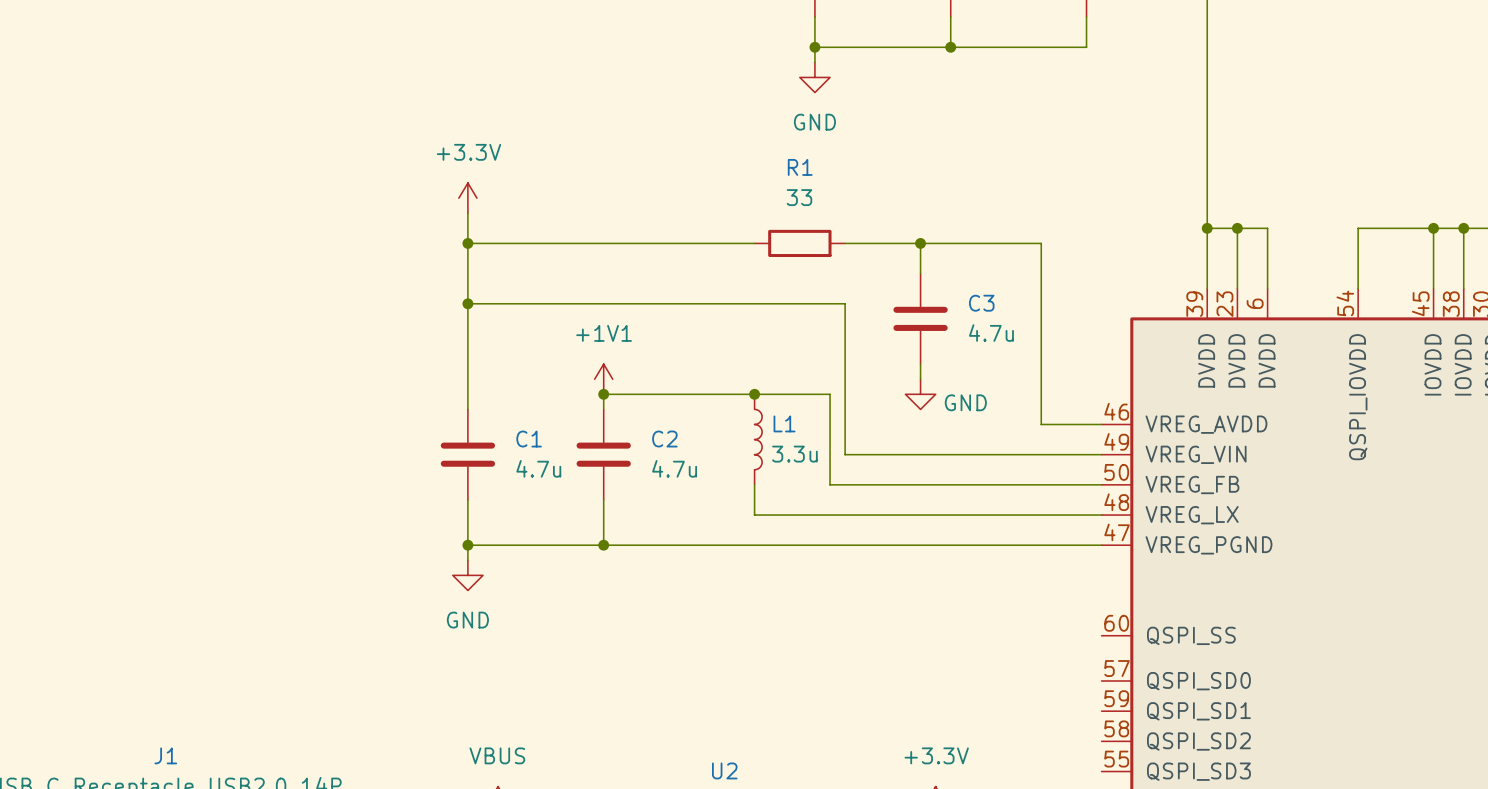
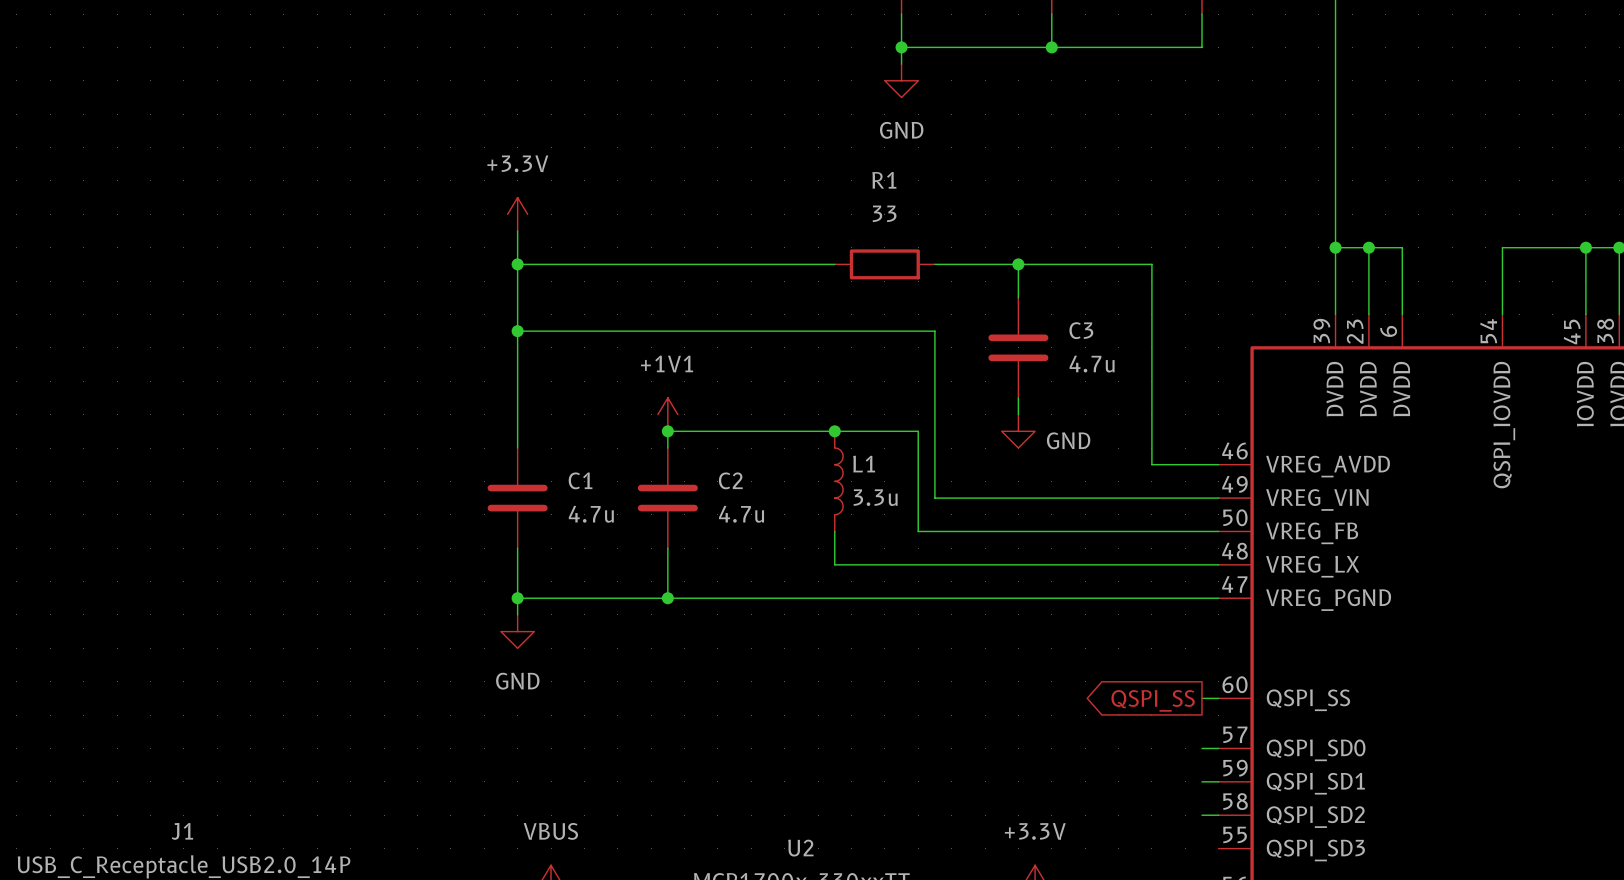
wire: none -> (1201, 698) (1218, 698)
global label: none -> QSPI_SS (1153, 700)
wire: none -> (1201, 748) (1218, 748)
wire: none -> (1201, 781) (1218, 781)
wire: none -> (1201, 815) (1218, 815)

